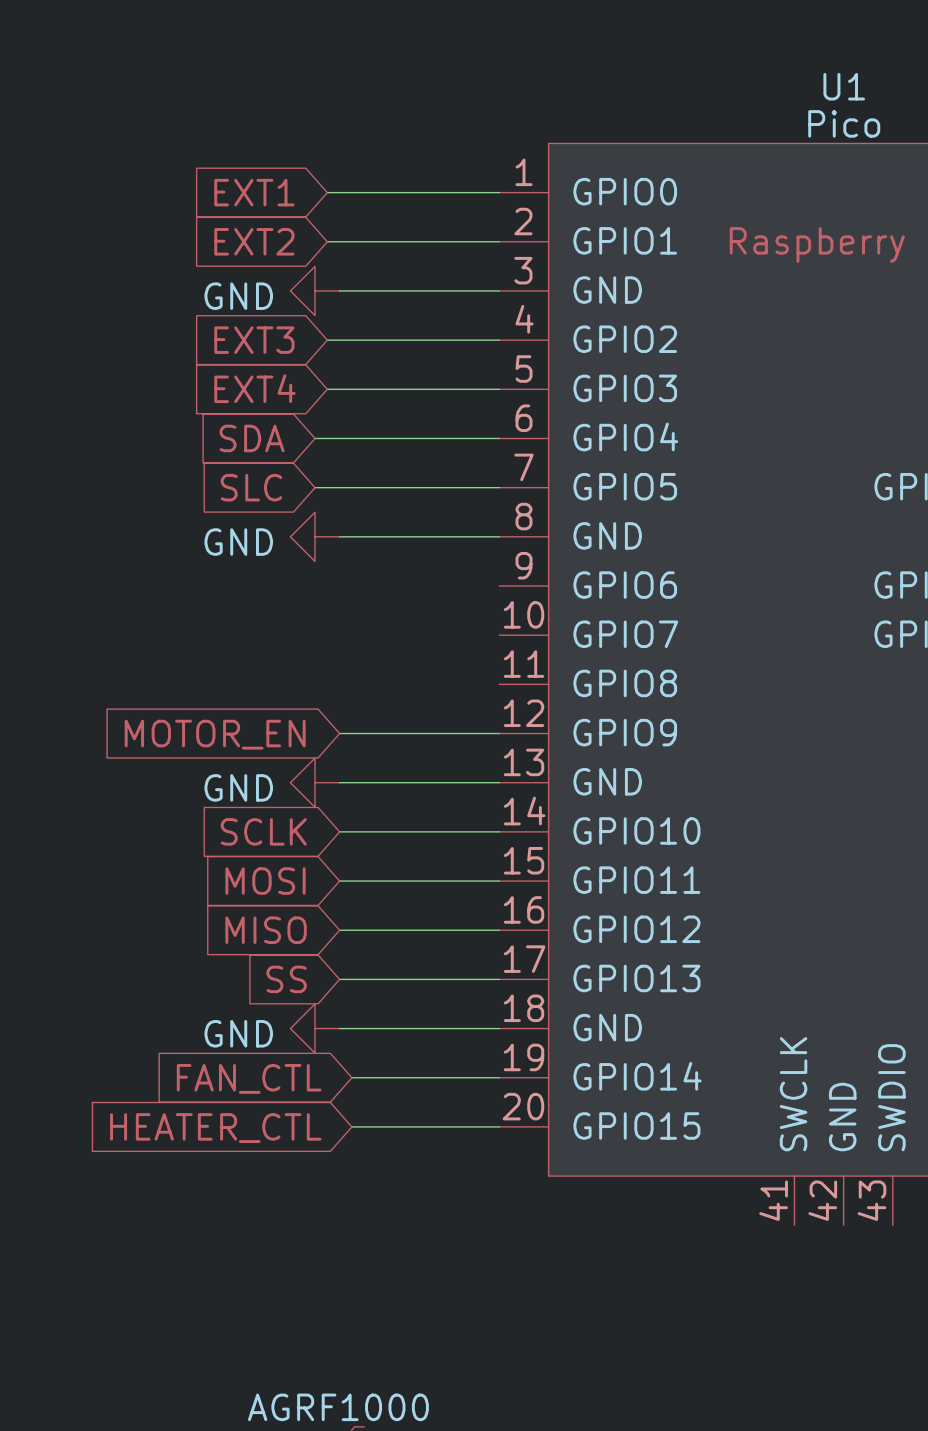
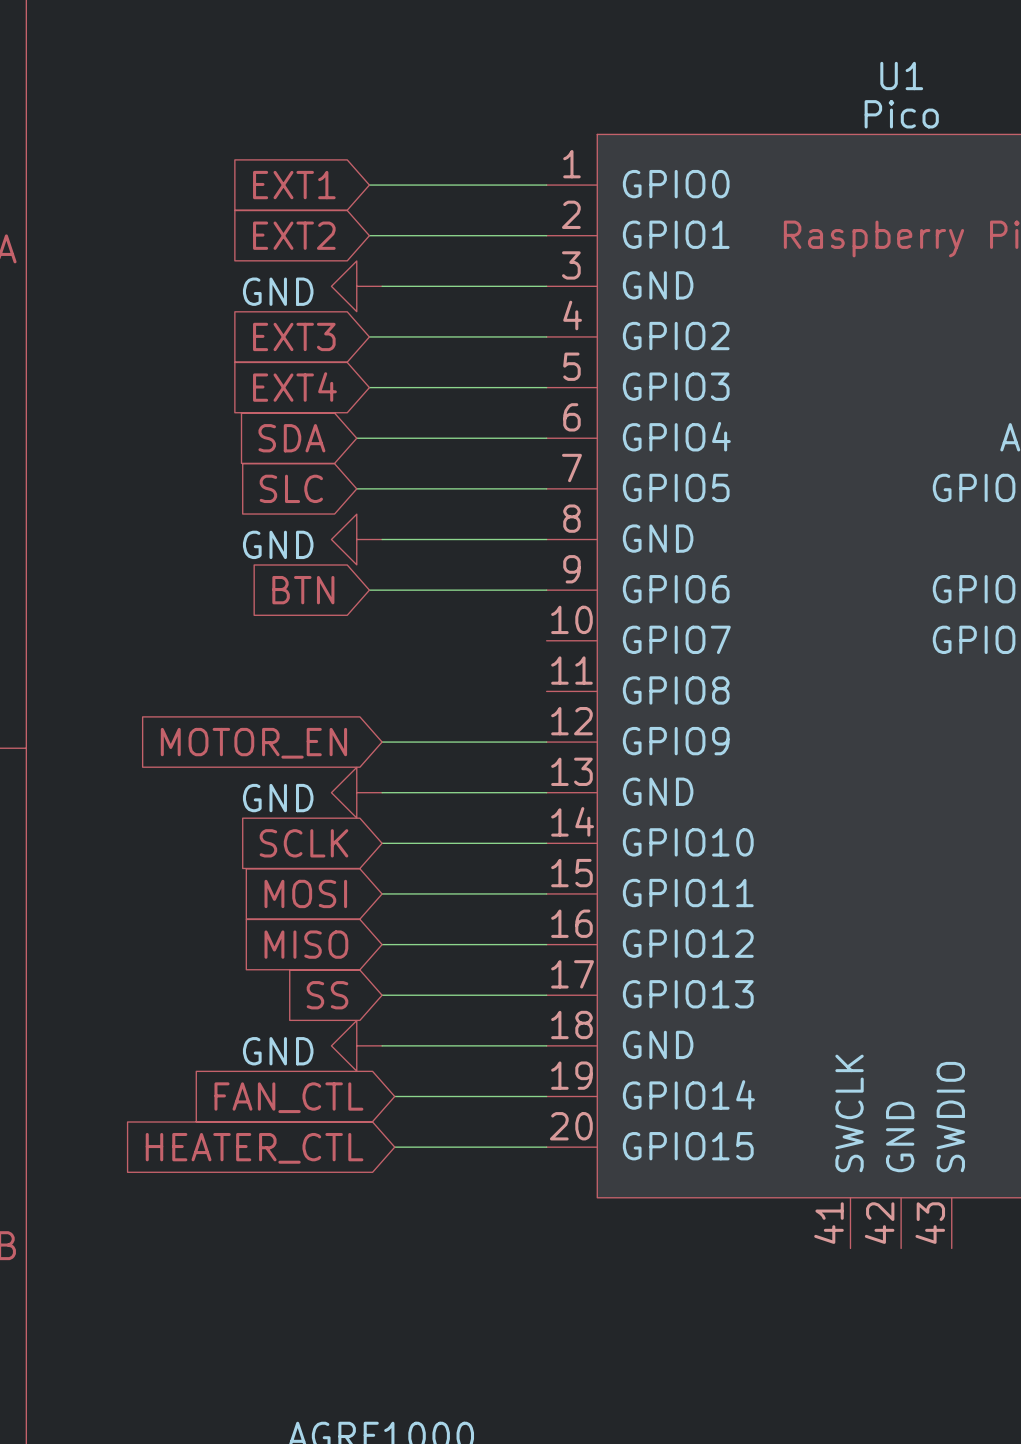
global label: none -> BTN (303, 590)
wire: none -> (369, 590) (546, 590)

